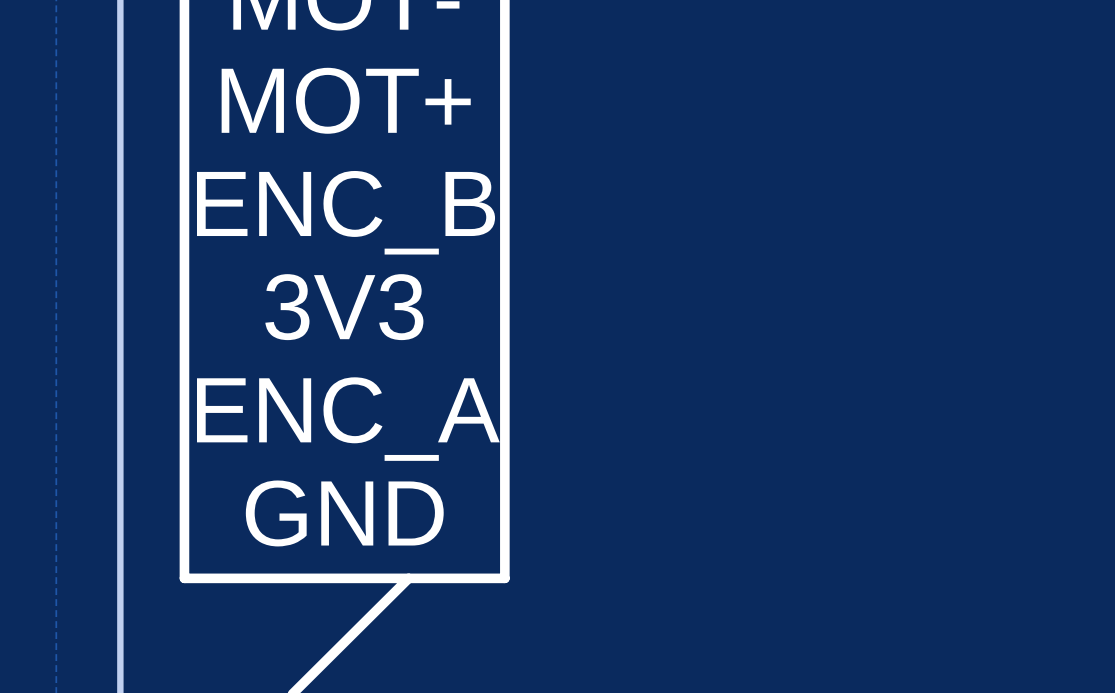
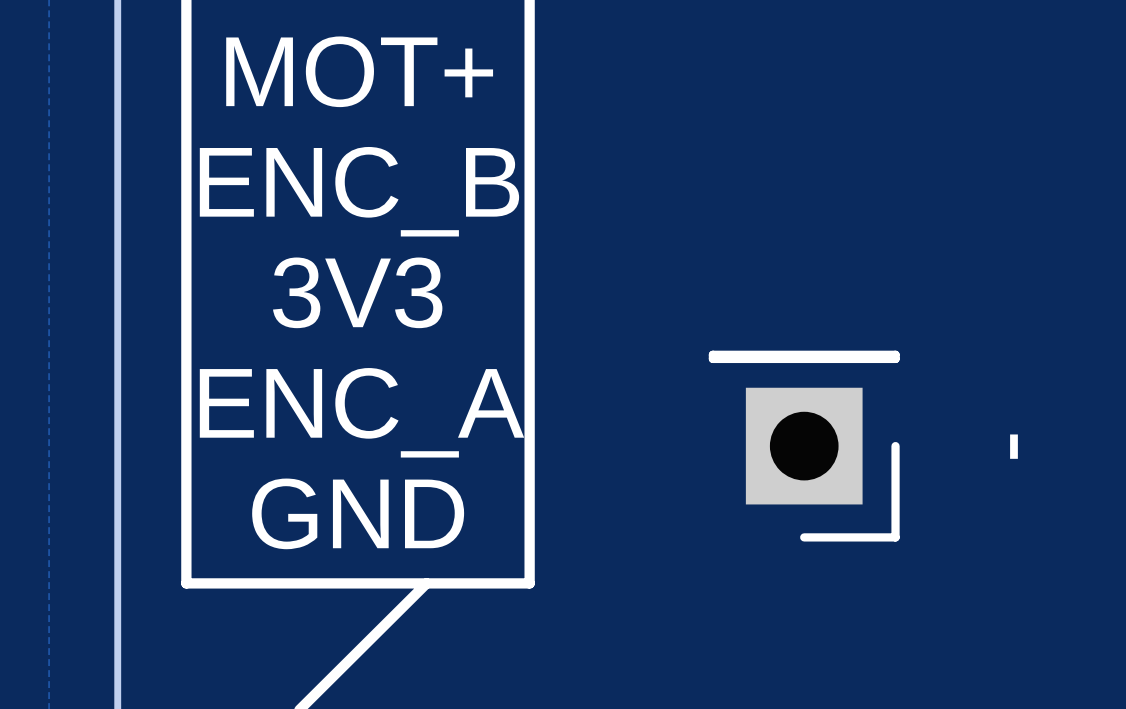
part: none -> (804, 446)
text: none -> - (1013, 446)

